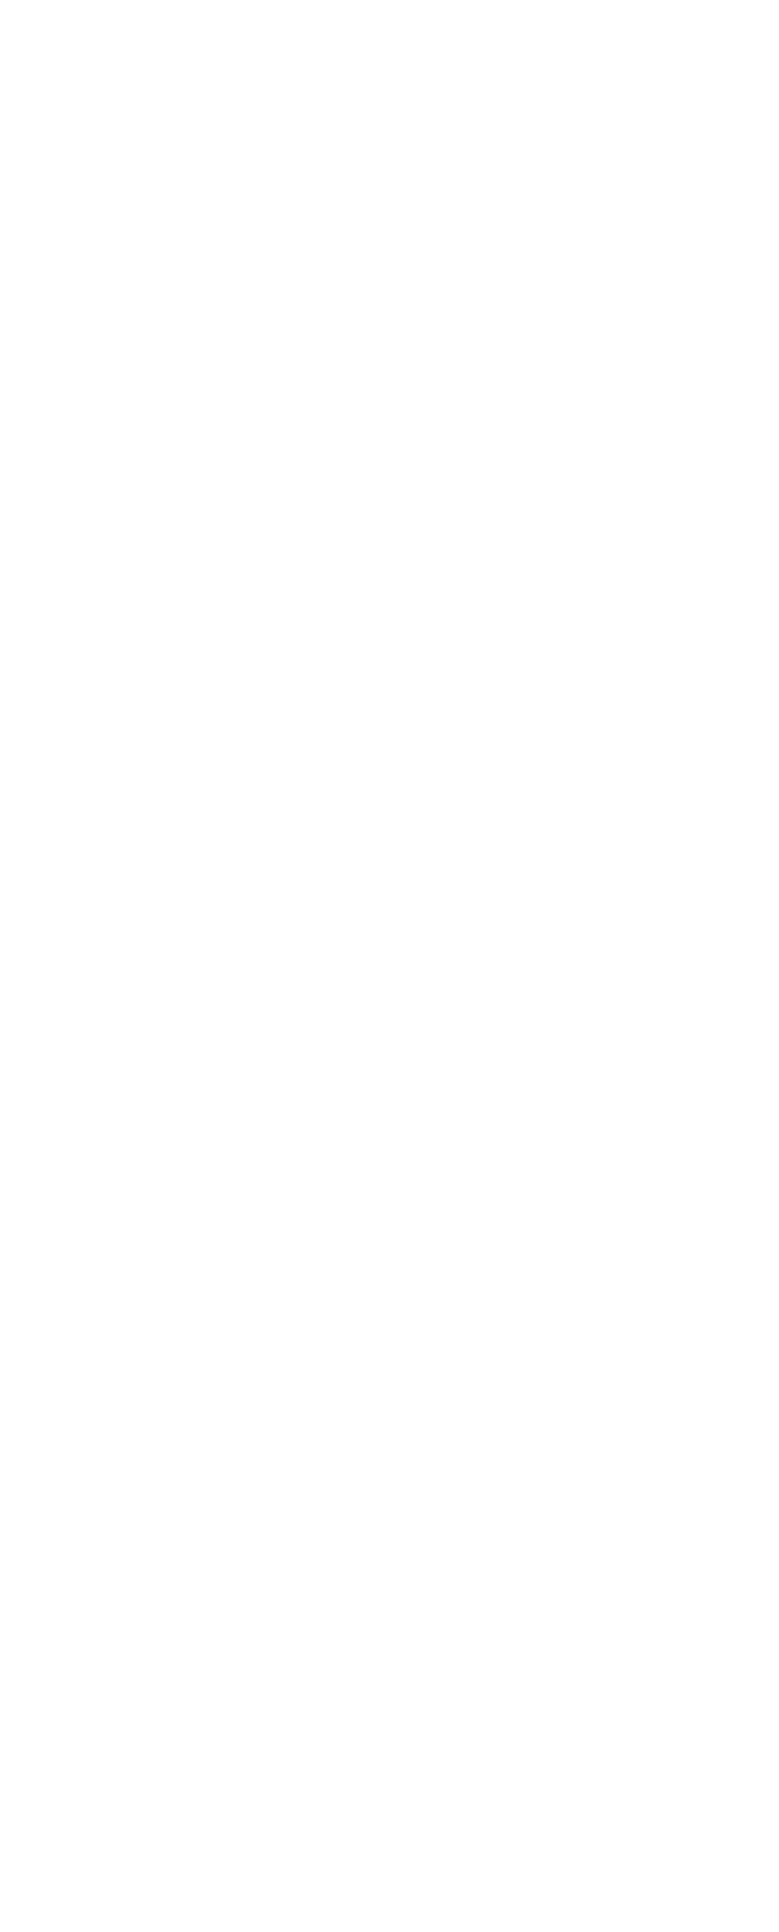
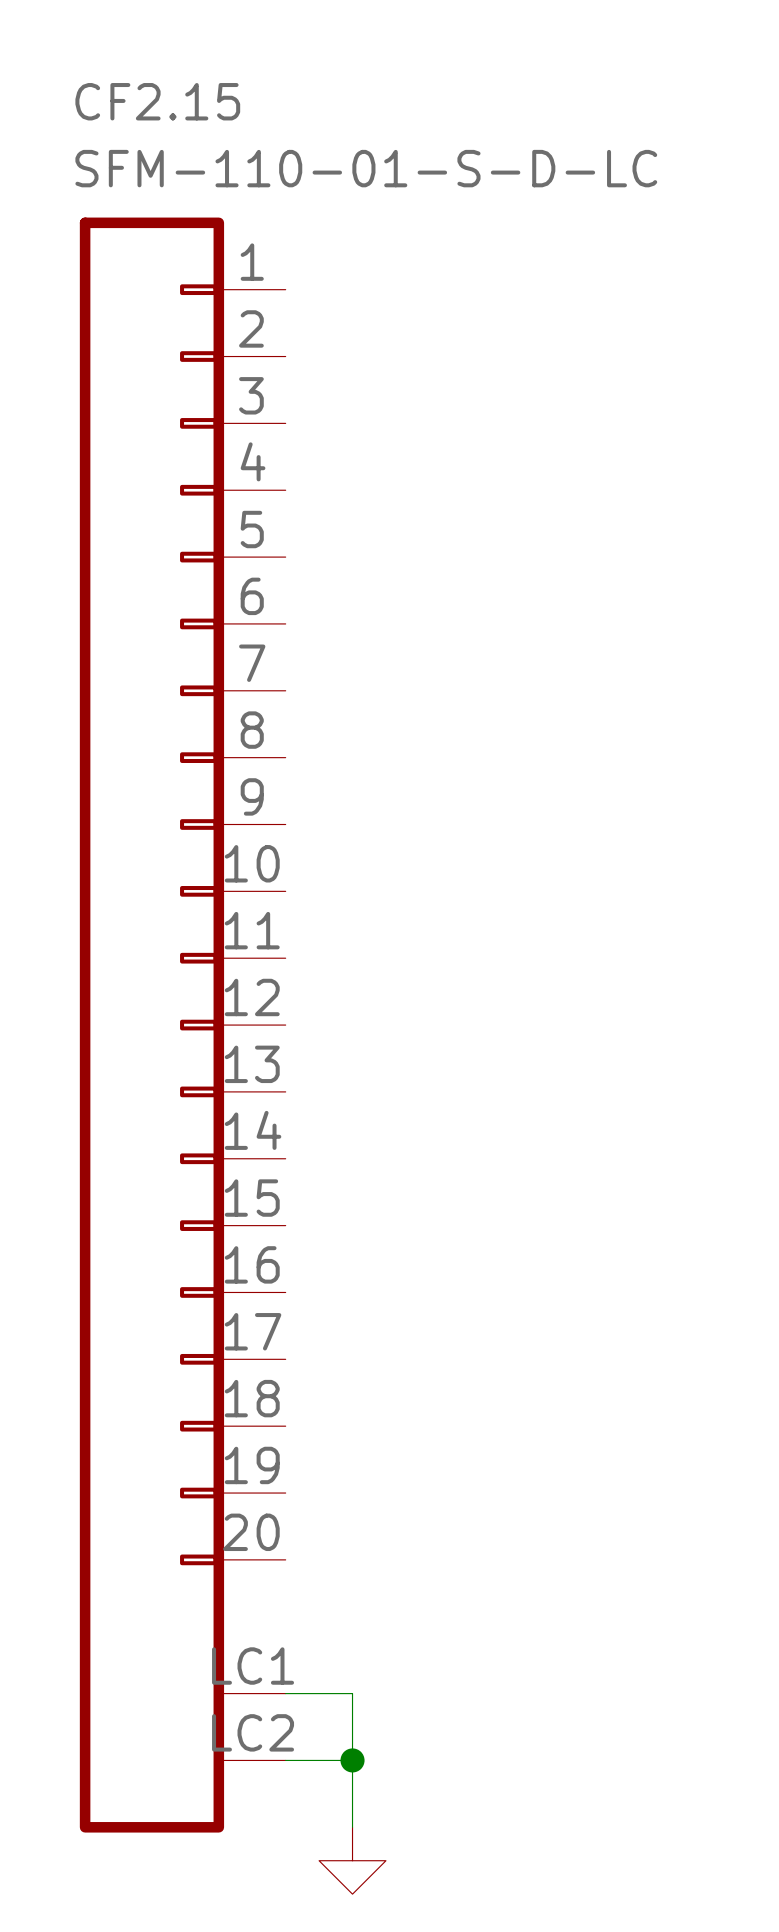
CF2.15: none -> SFM-110-01-S-D-LC (182, 1025)
wire: none -> (285, 1693) (352, 1693) (352, 1827)
wire: none -> (285, 1760) (352, 1760)
junction: none -> (352, 1760)
power symbol: none -> (352, 1860)

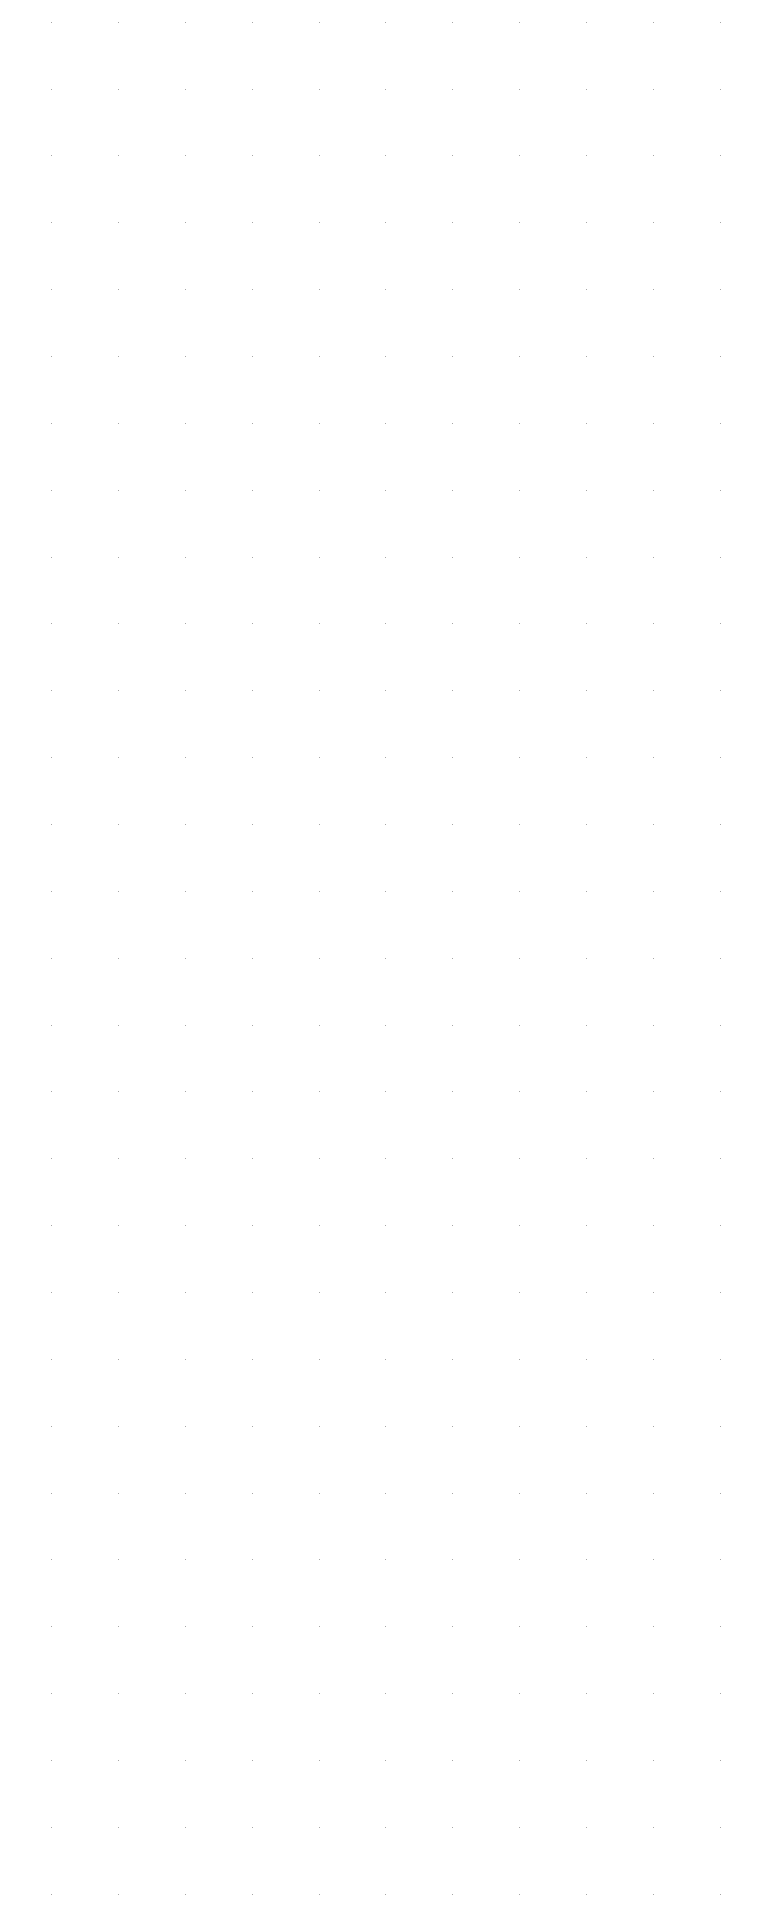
CF2.15: SFM-110-01-S-D-LC (182, 1025) -> none
wire: (285, 1693) (352, 1693) (352, 1827) -> none
wire: (285, 1760) (352, 1760) -> none
junction: (352, 1760) -> none
power symbol: (352, 1860) -> none

